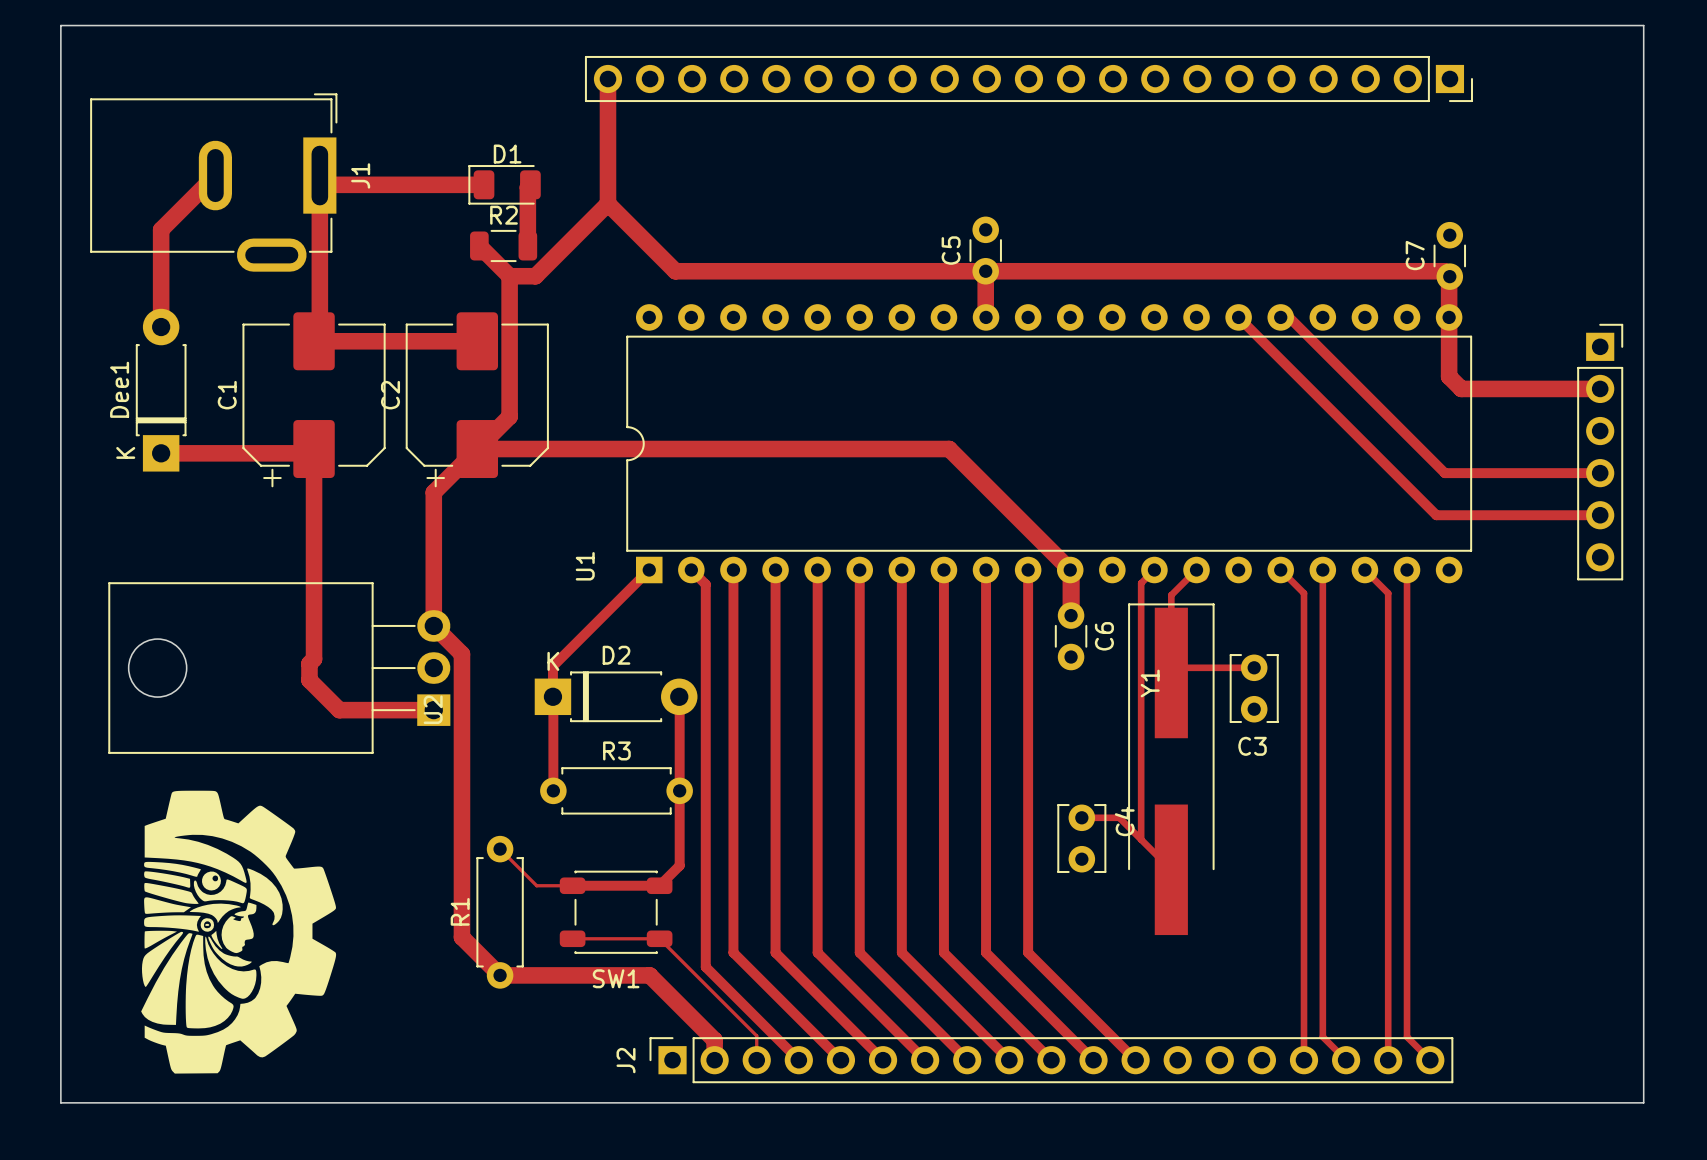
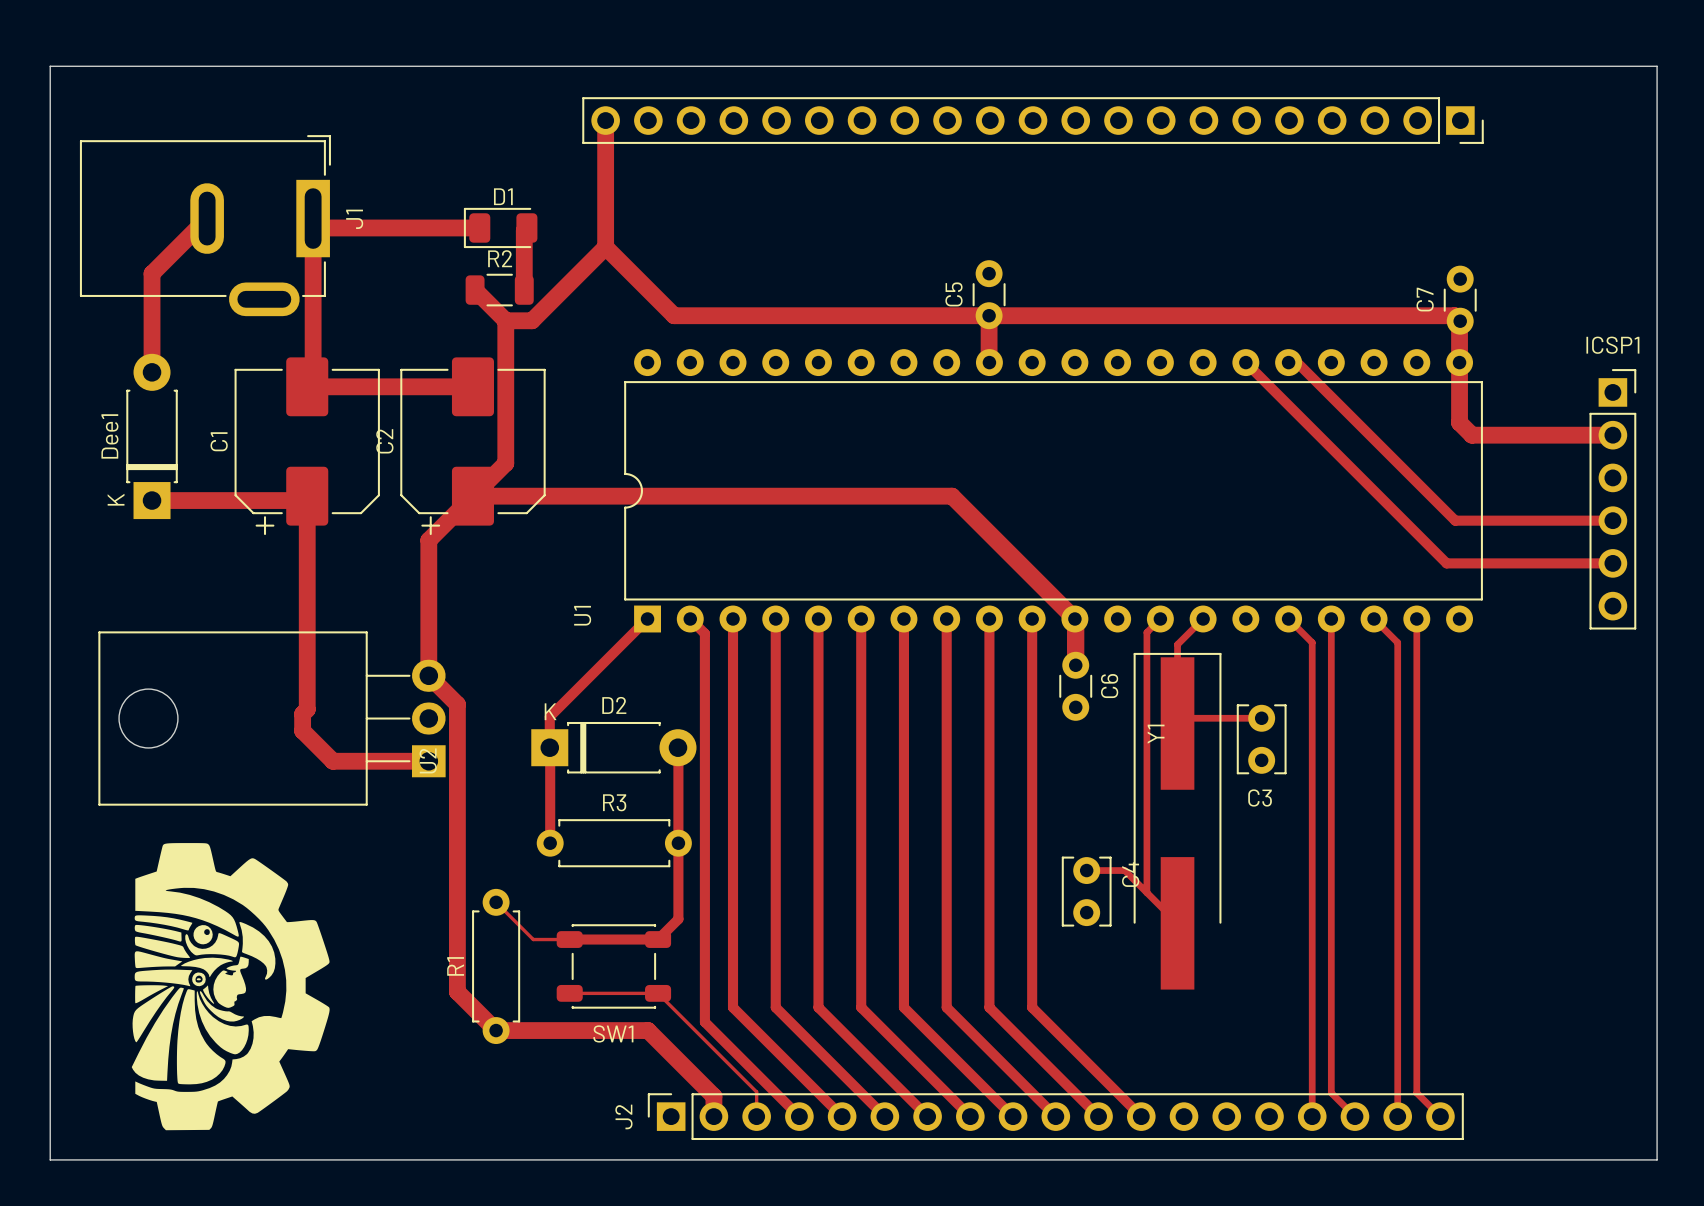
ICSP1 name: none -> ICSP1 (1612, 345)

